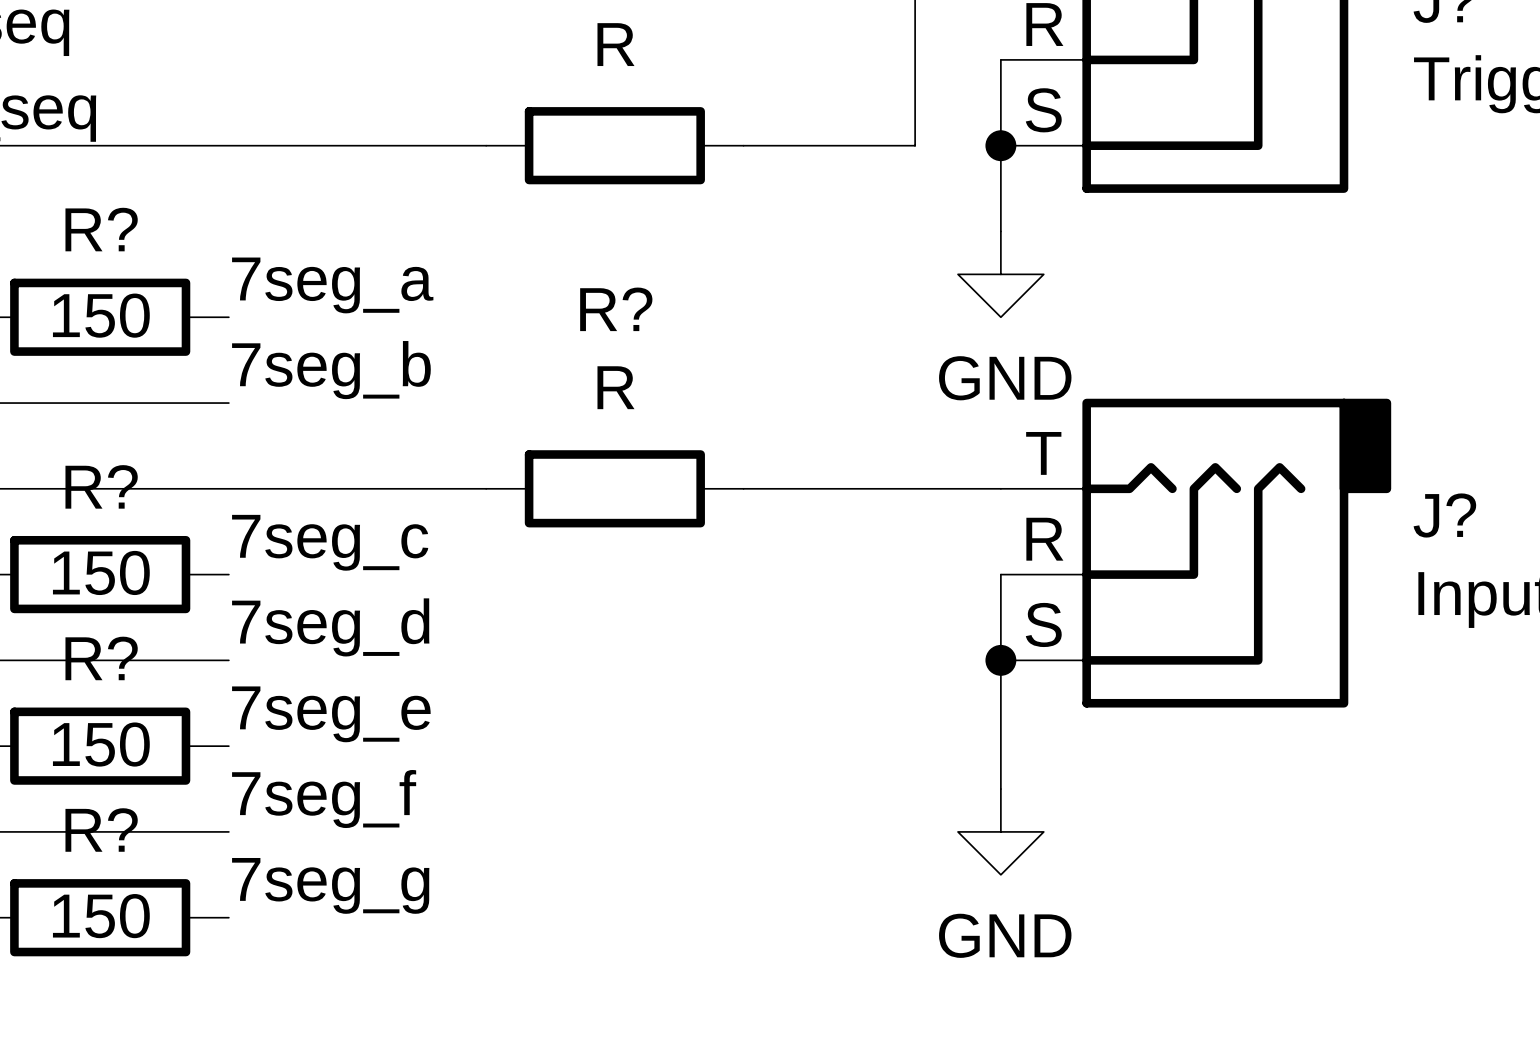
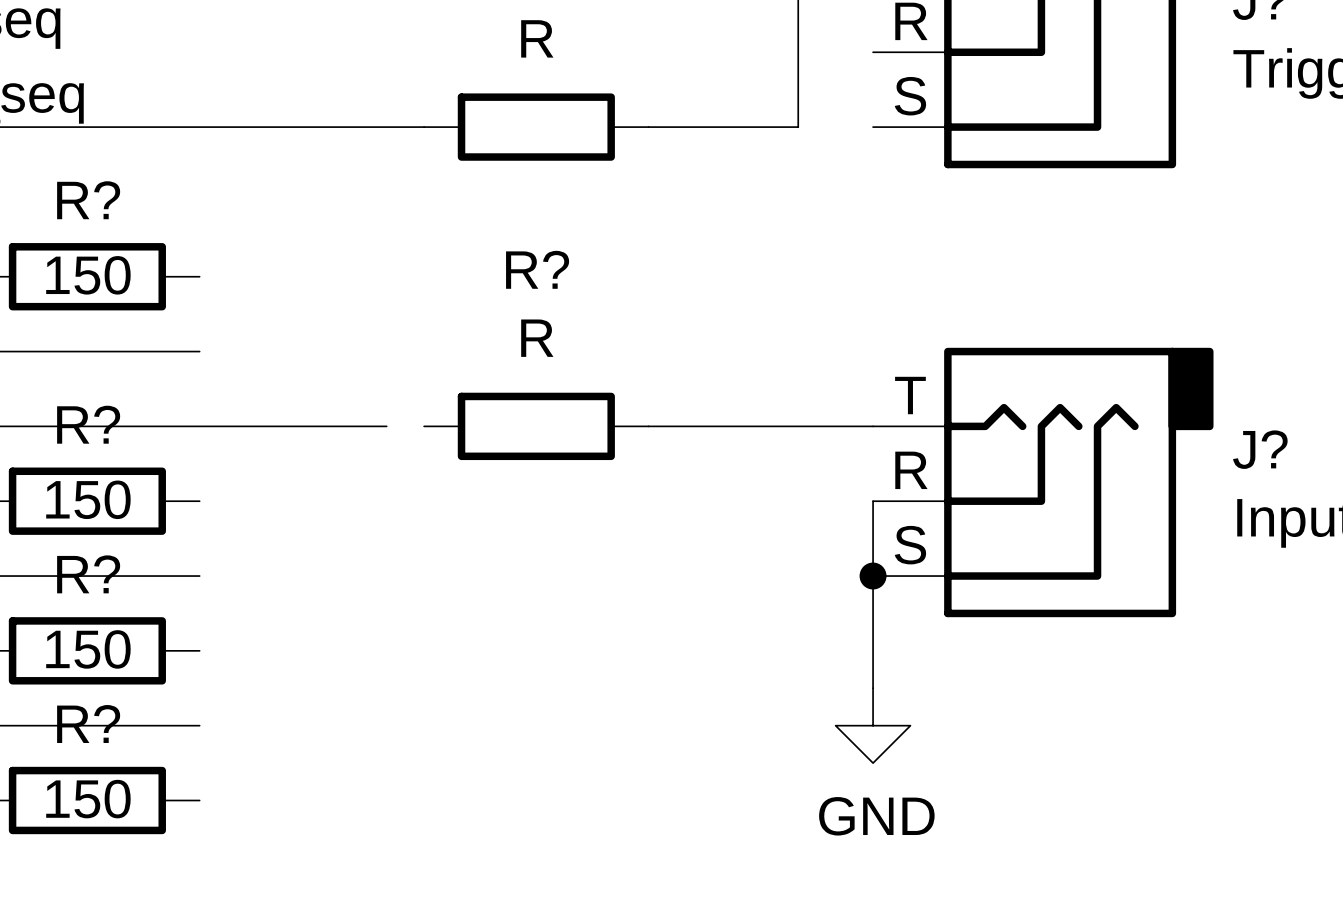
wire: (1000, 59) (1000, 231) -> none
junction: (1000, 145) -> none
power symbol: GND (1000, 274) -> none
label: 7seg_a (332, 285) -> none
label: 7seg_b (331, 370) -> none
wire: (443, 488) (486, 488) -> none
label: 7seg_c (330, 542) -> none
label: 7seg_d (330, 627) -> none
label: 7seg_e (331, 714) -> none
label: 7seg_f (324, 799) -> none
label: 7seg_g (330, 885) -> none

